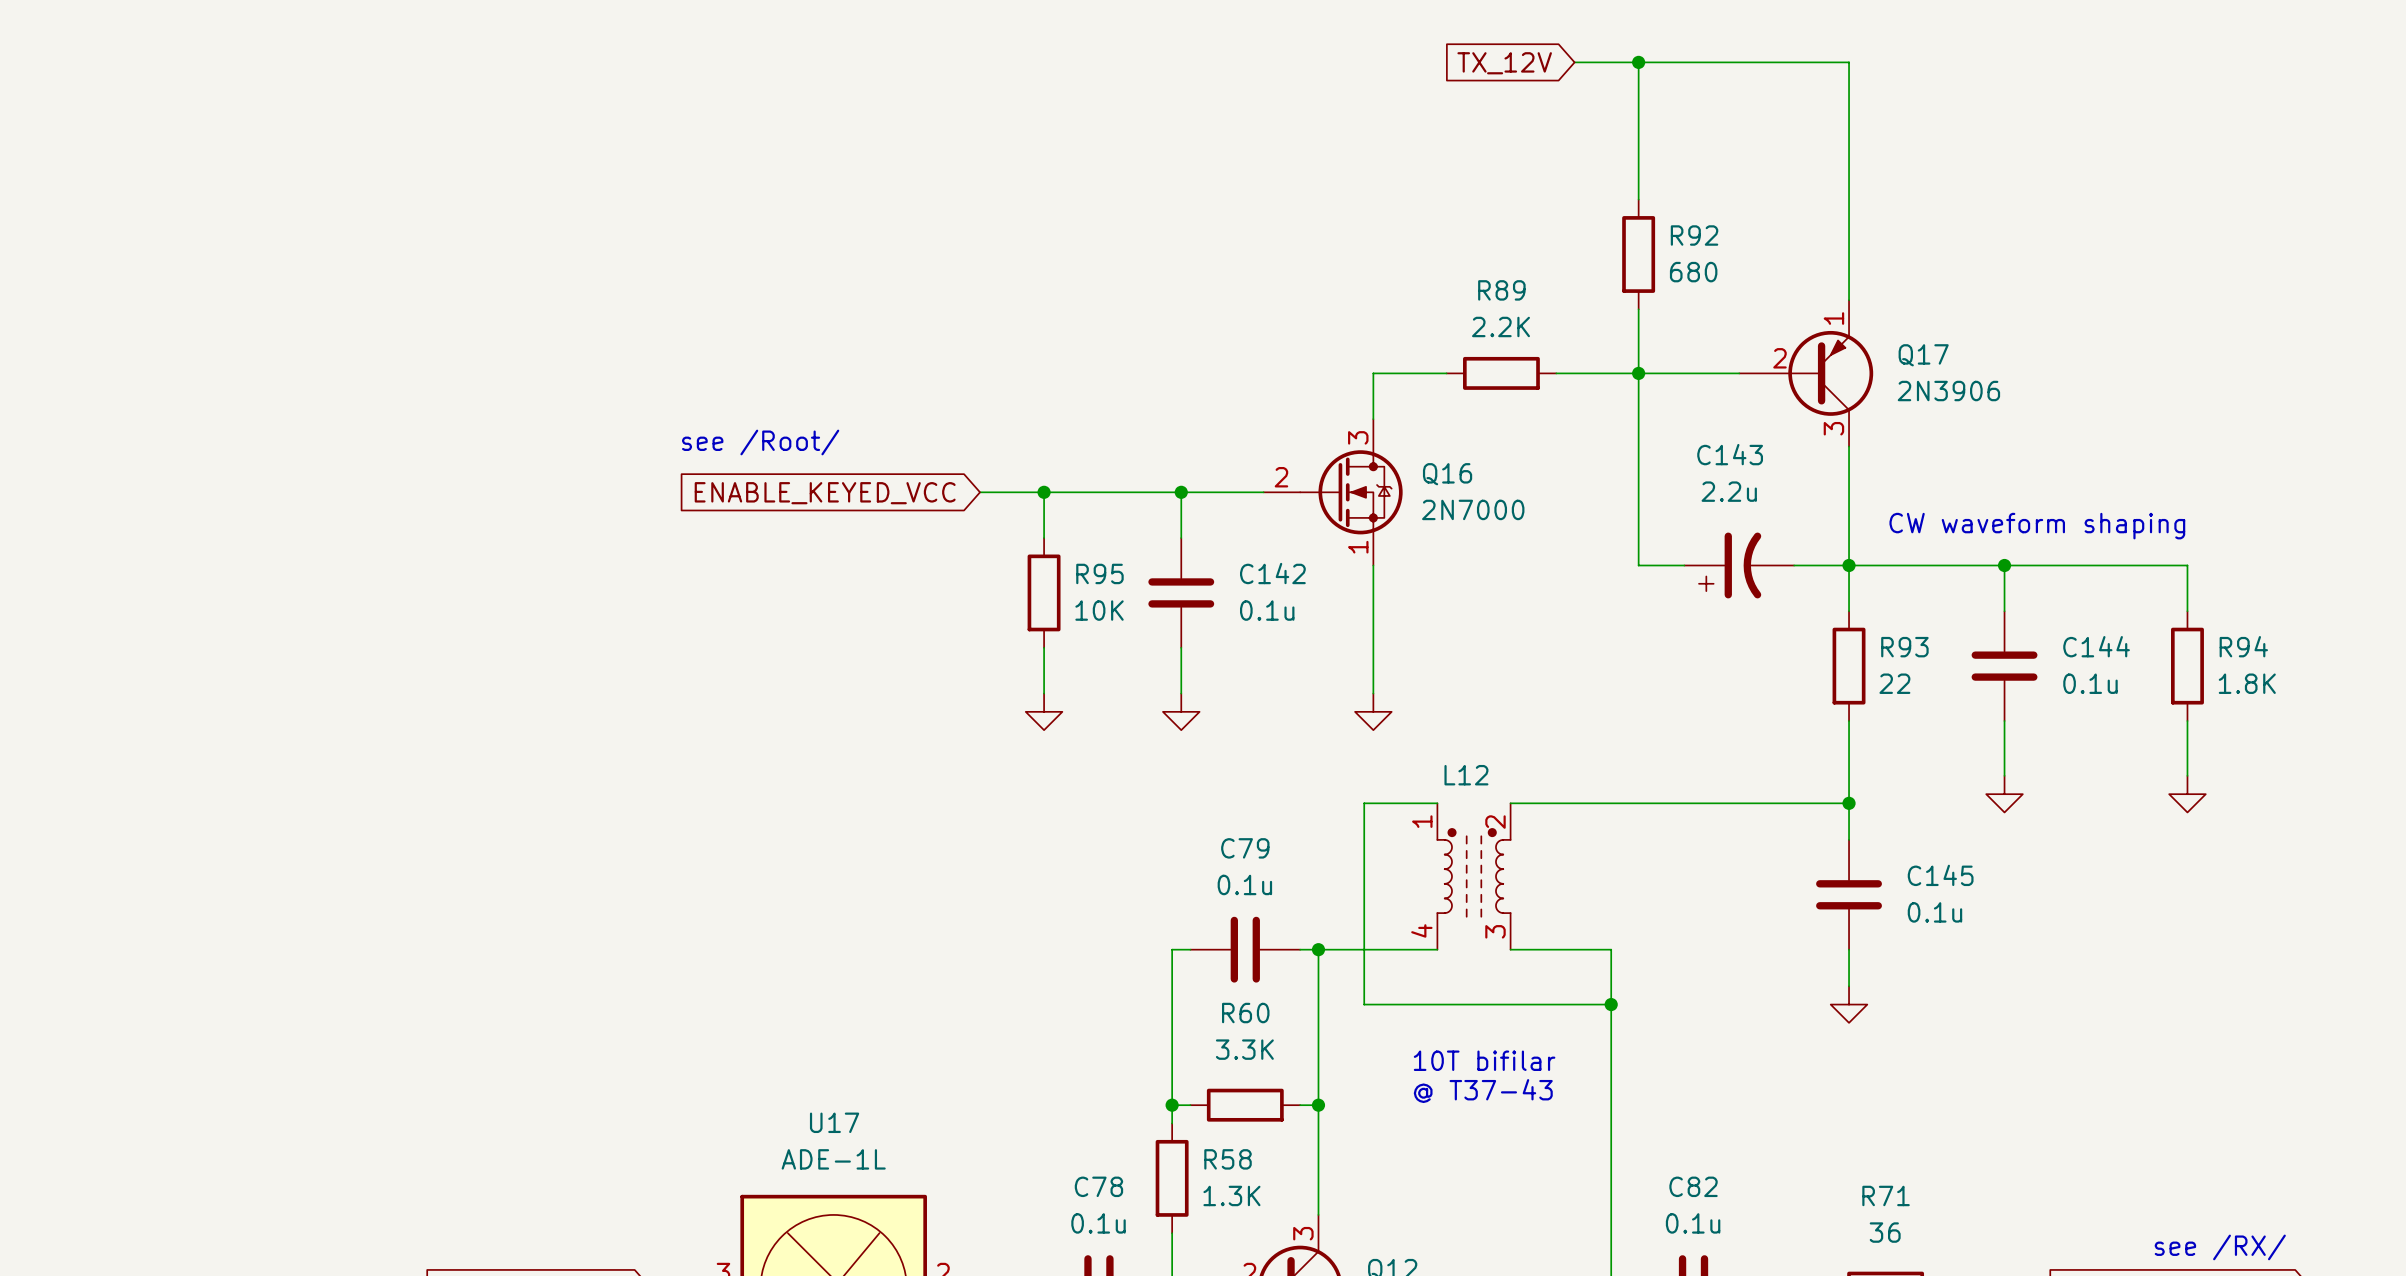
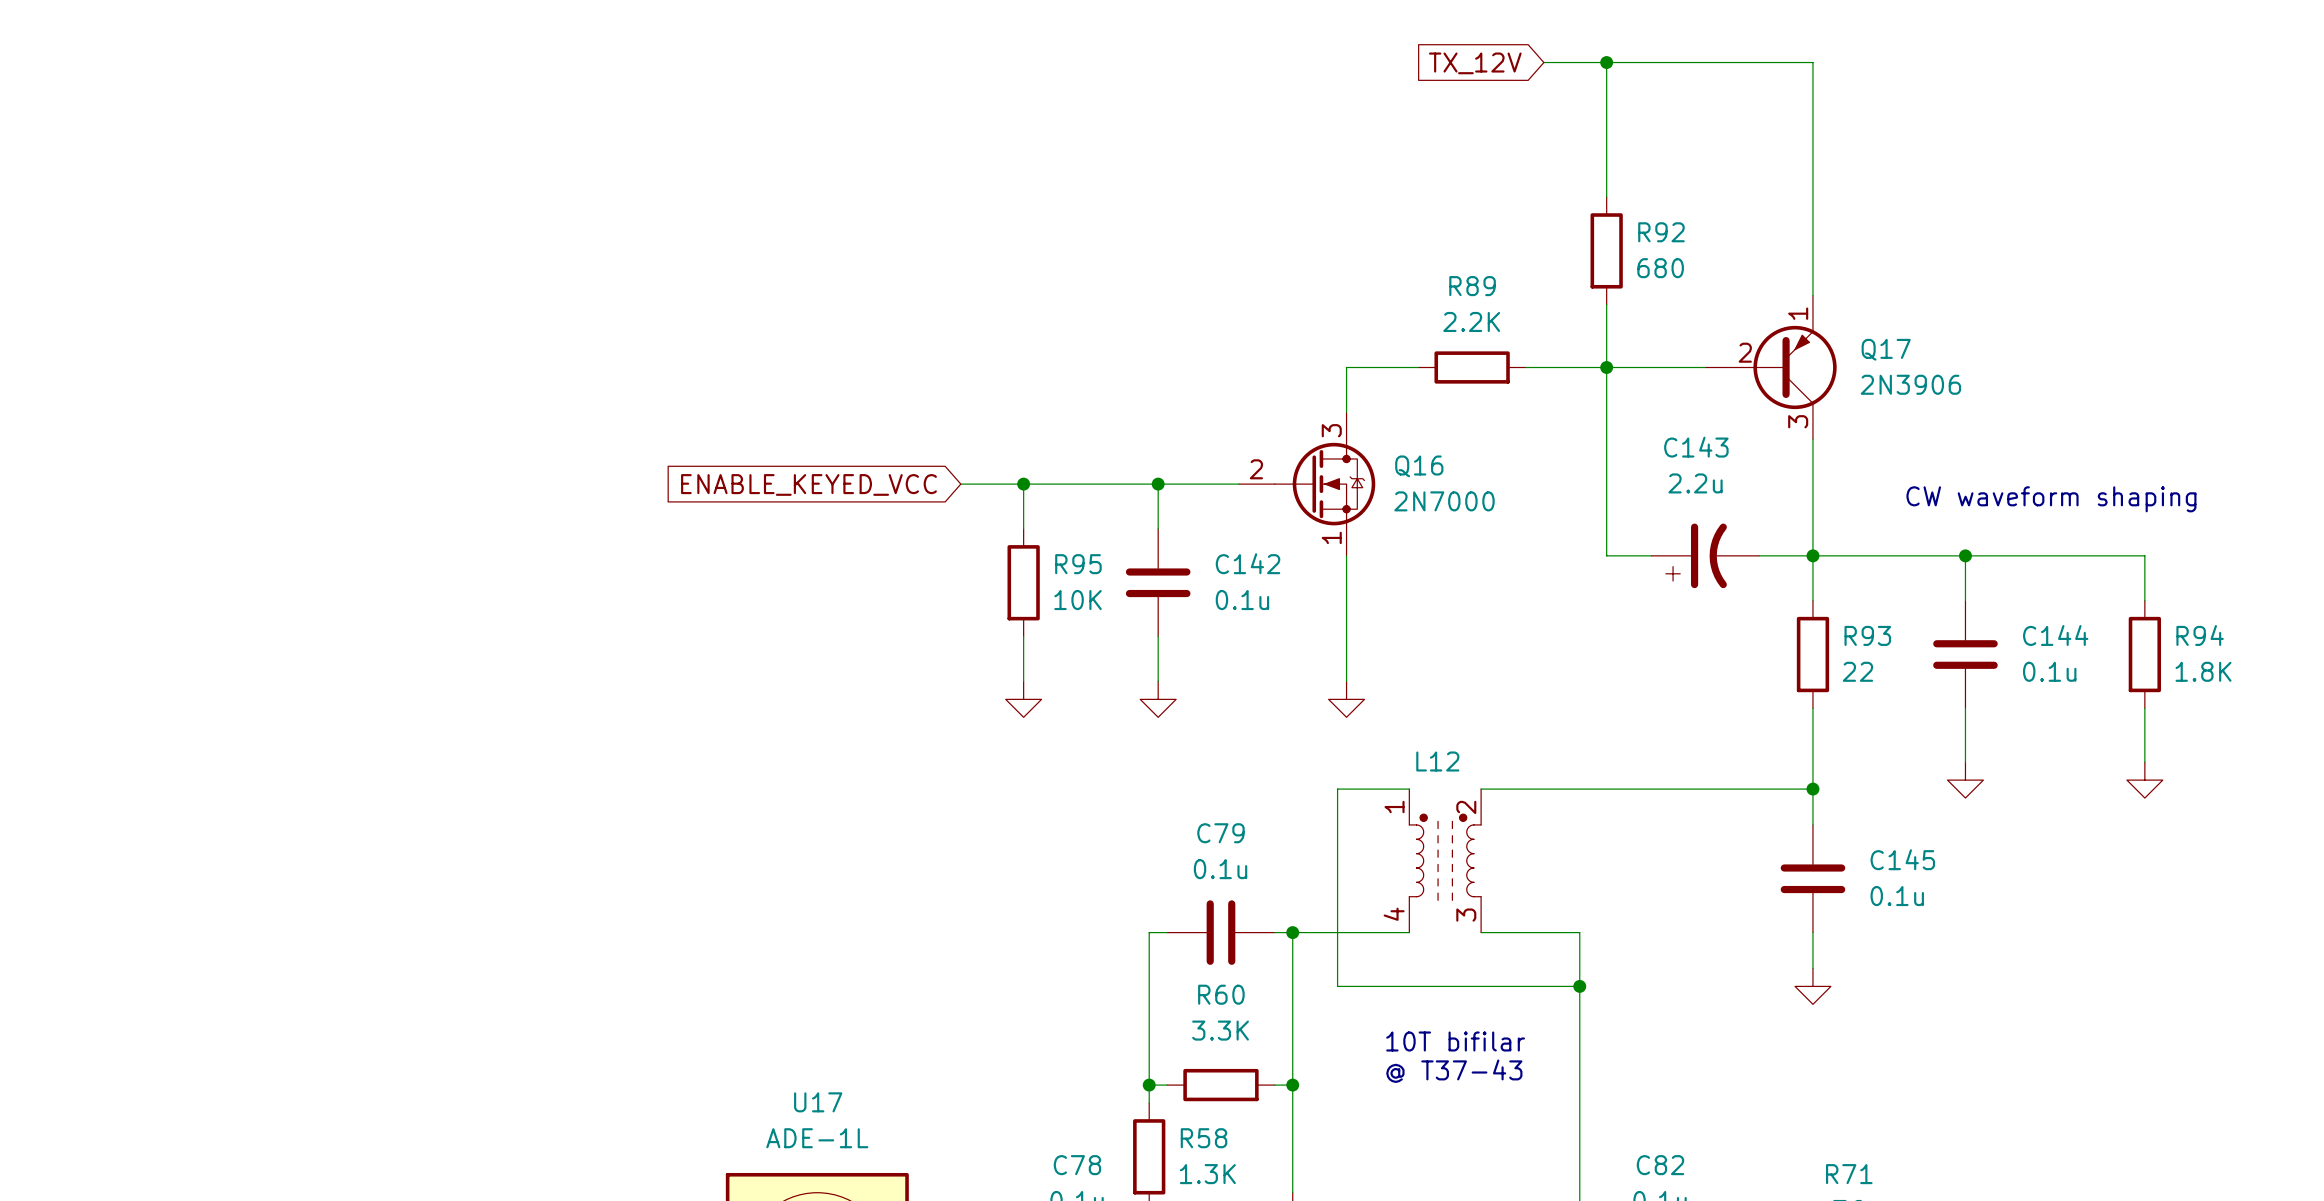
text: see /Root/ (760, 442) -> none
text position: CW waveform shaping (2037, 526) -> CW waveform shaping (2051, 499)

